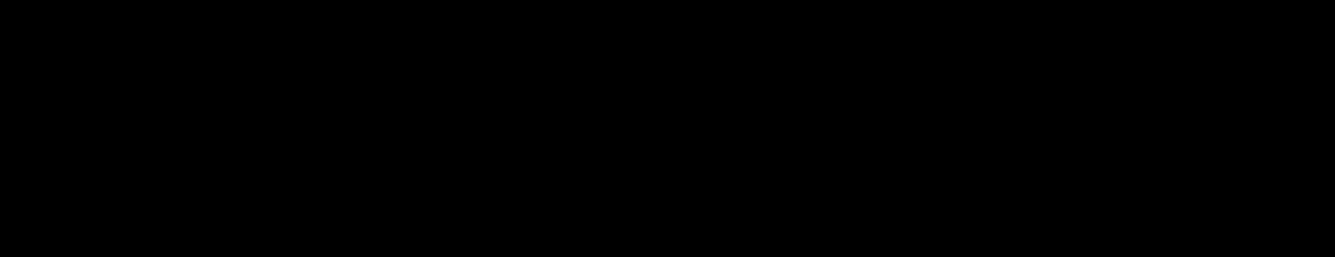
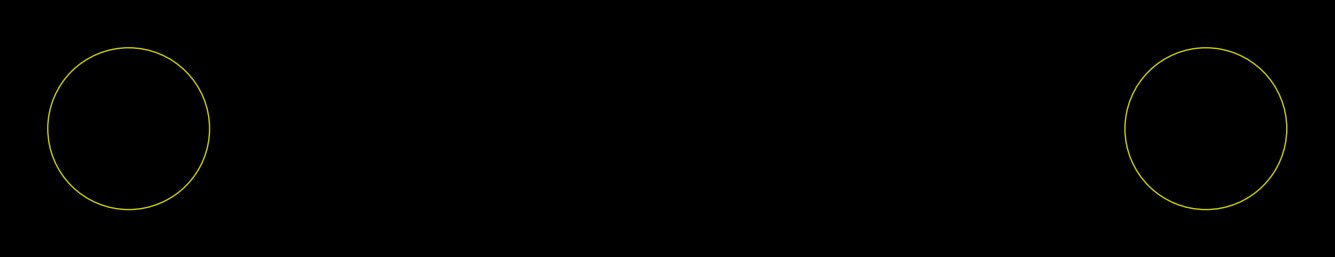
round board edge: none -> [47, 47, 211, 211]
round board edge: none -> [1124, 47, 1288, 211]

